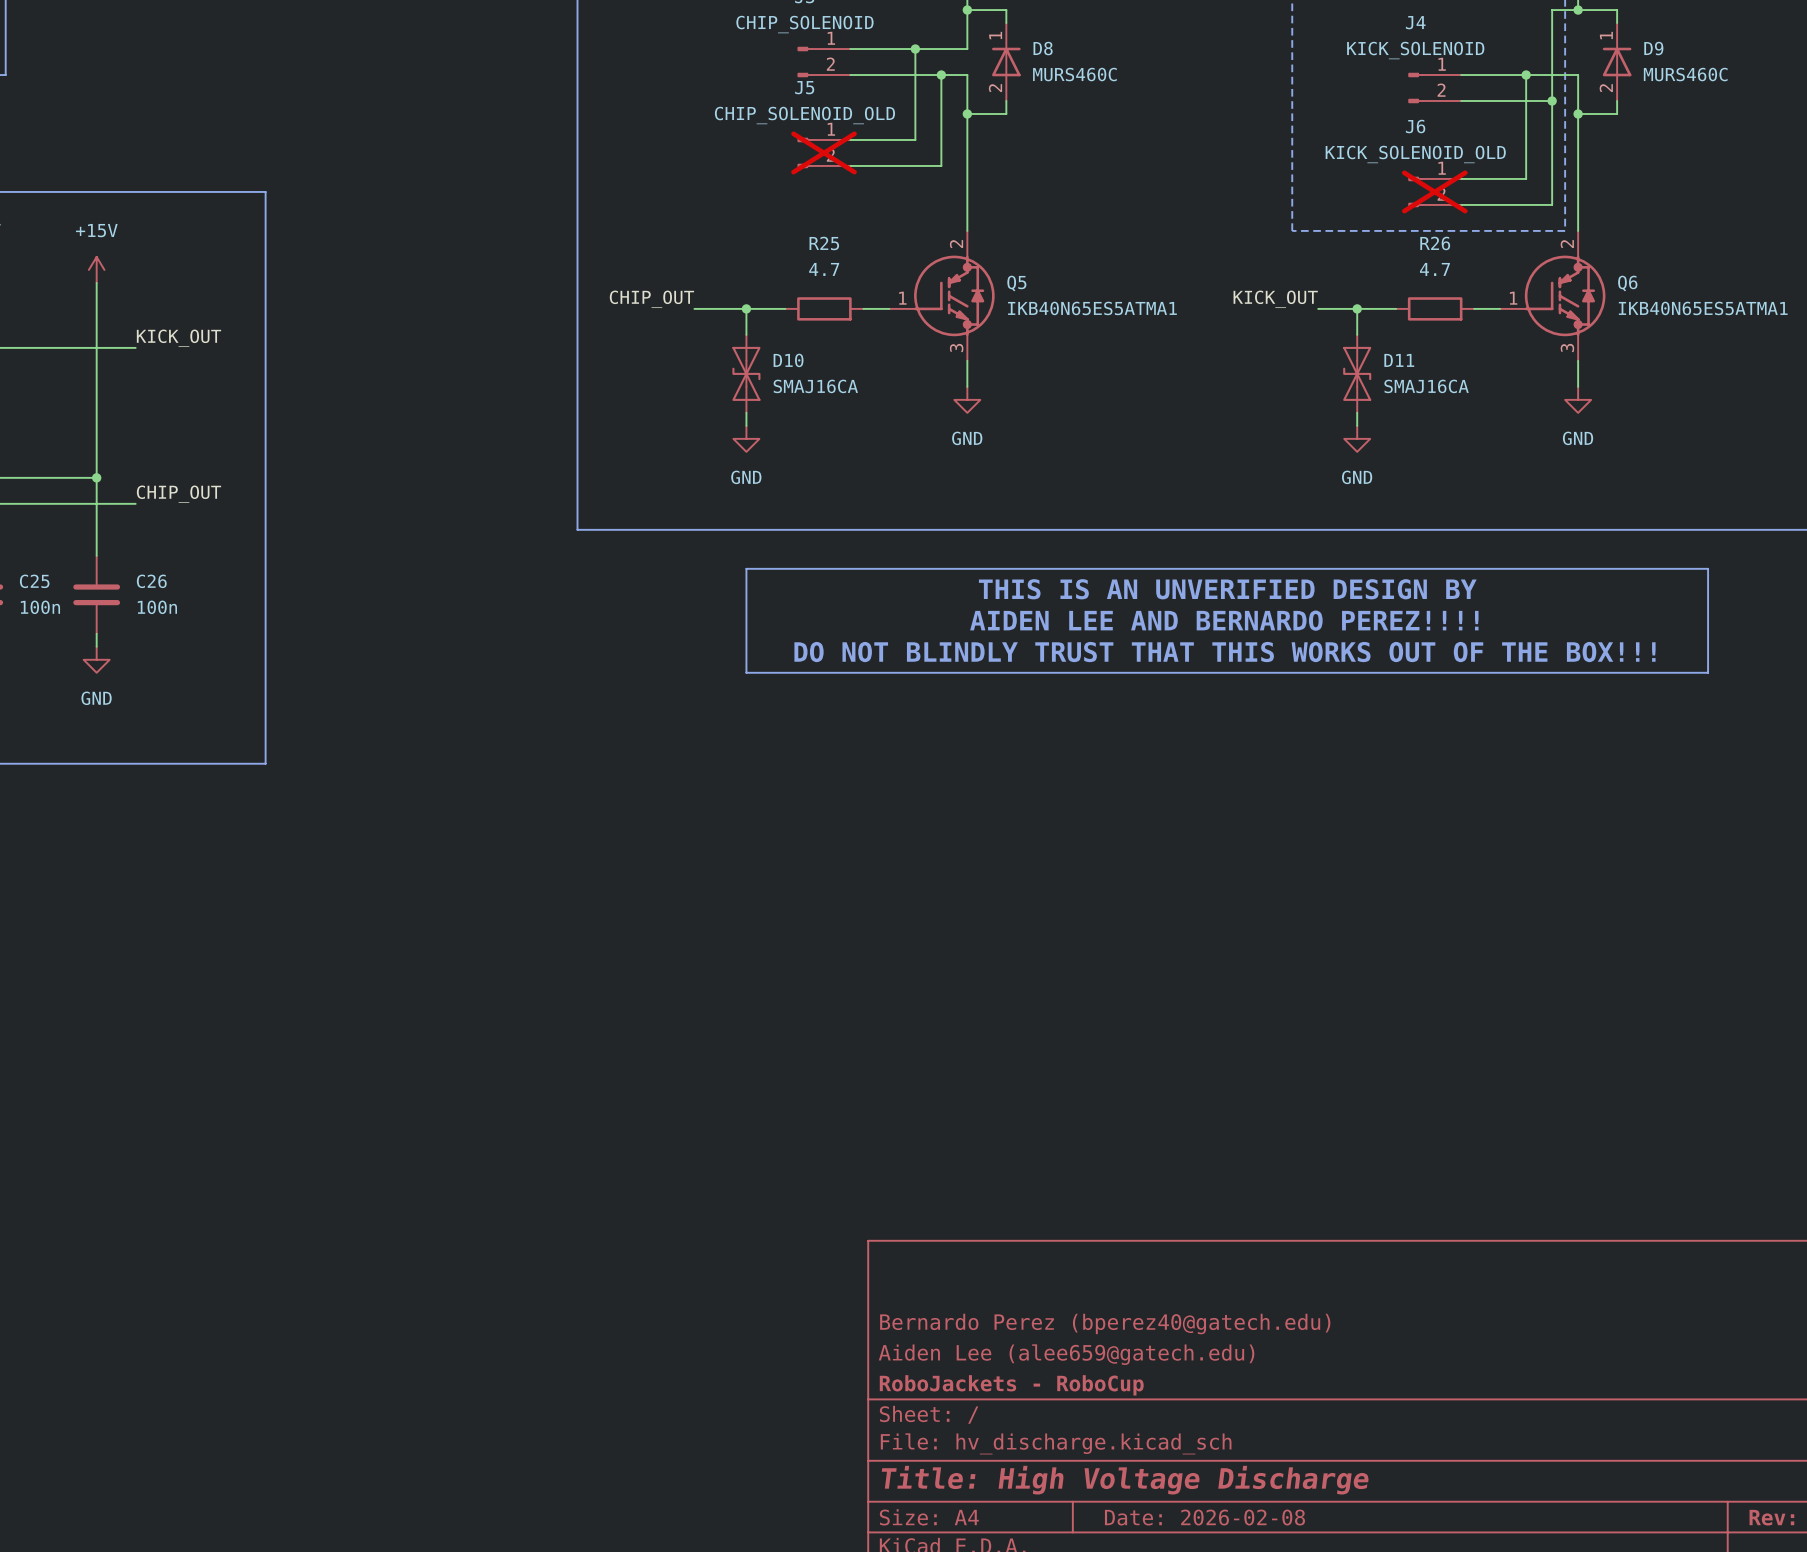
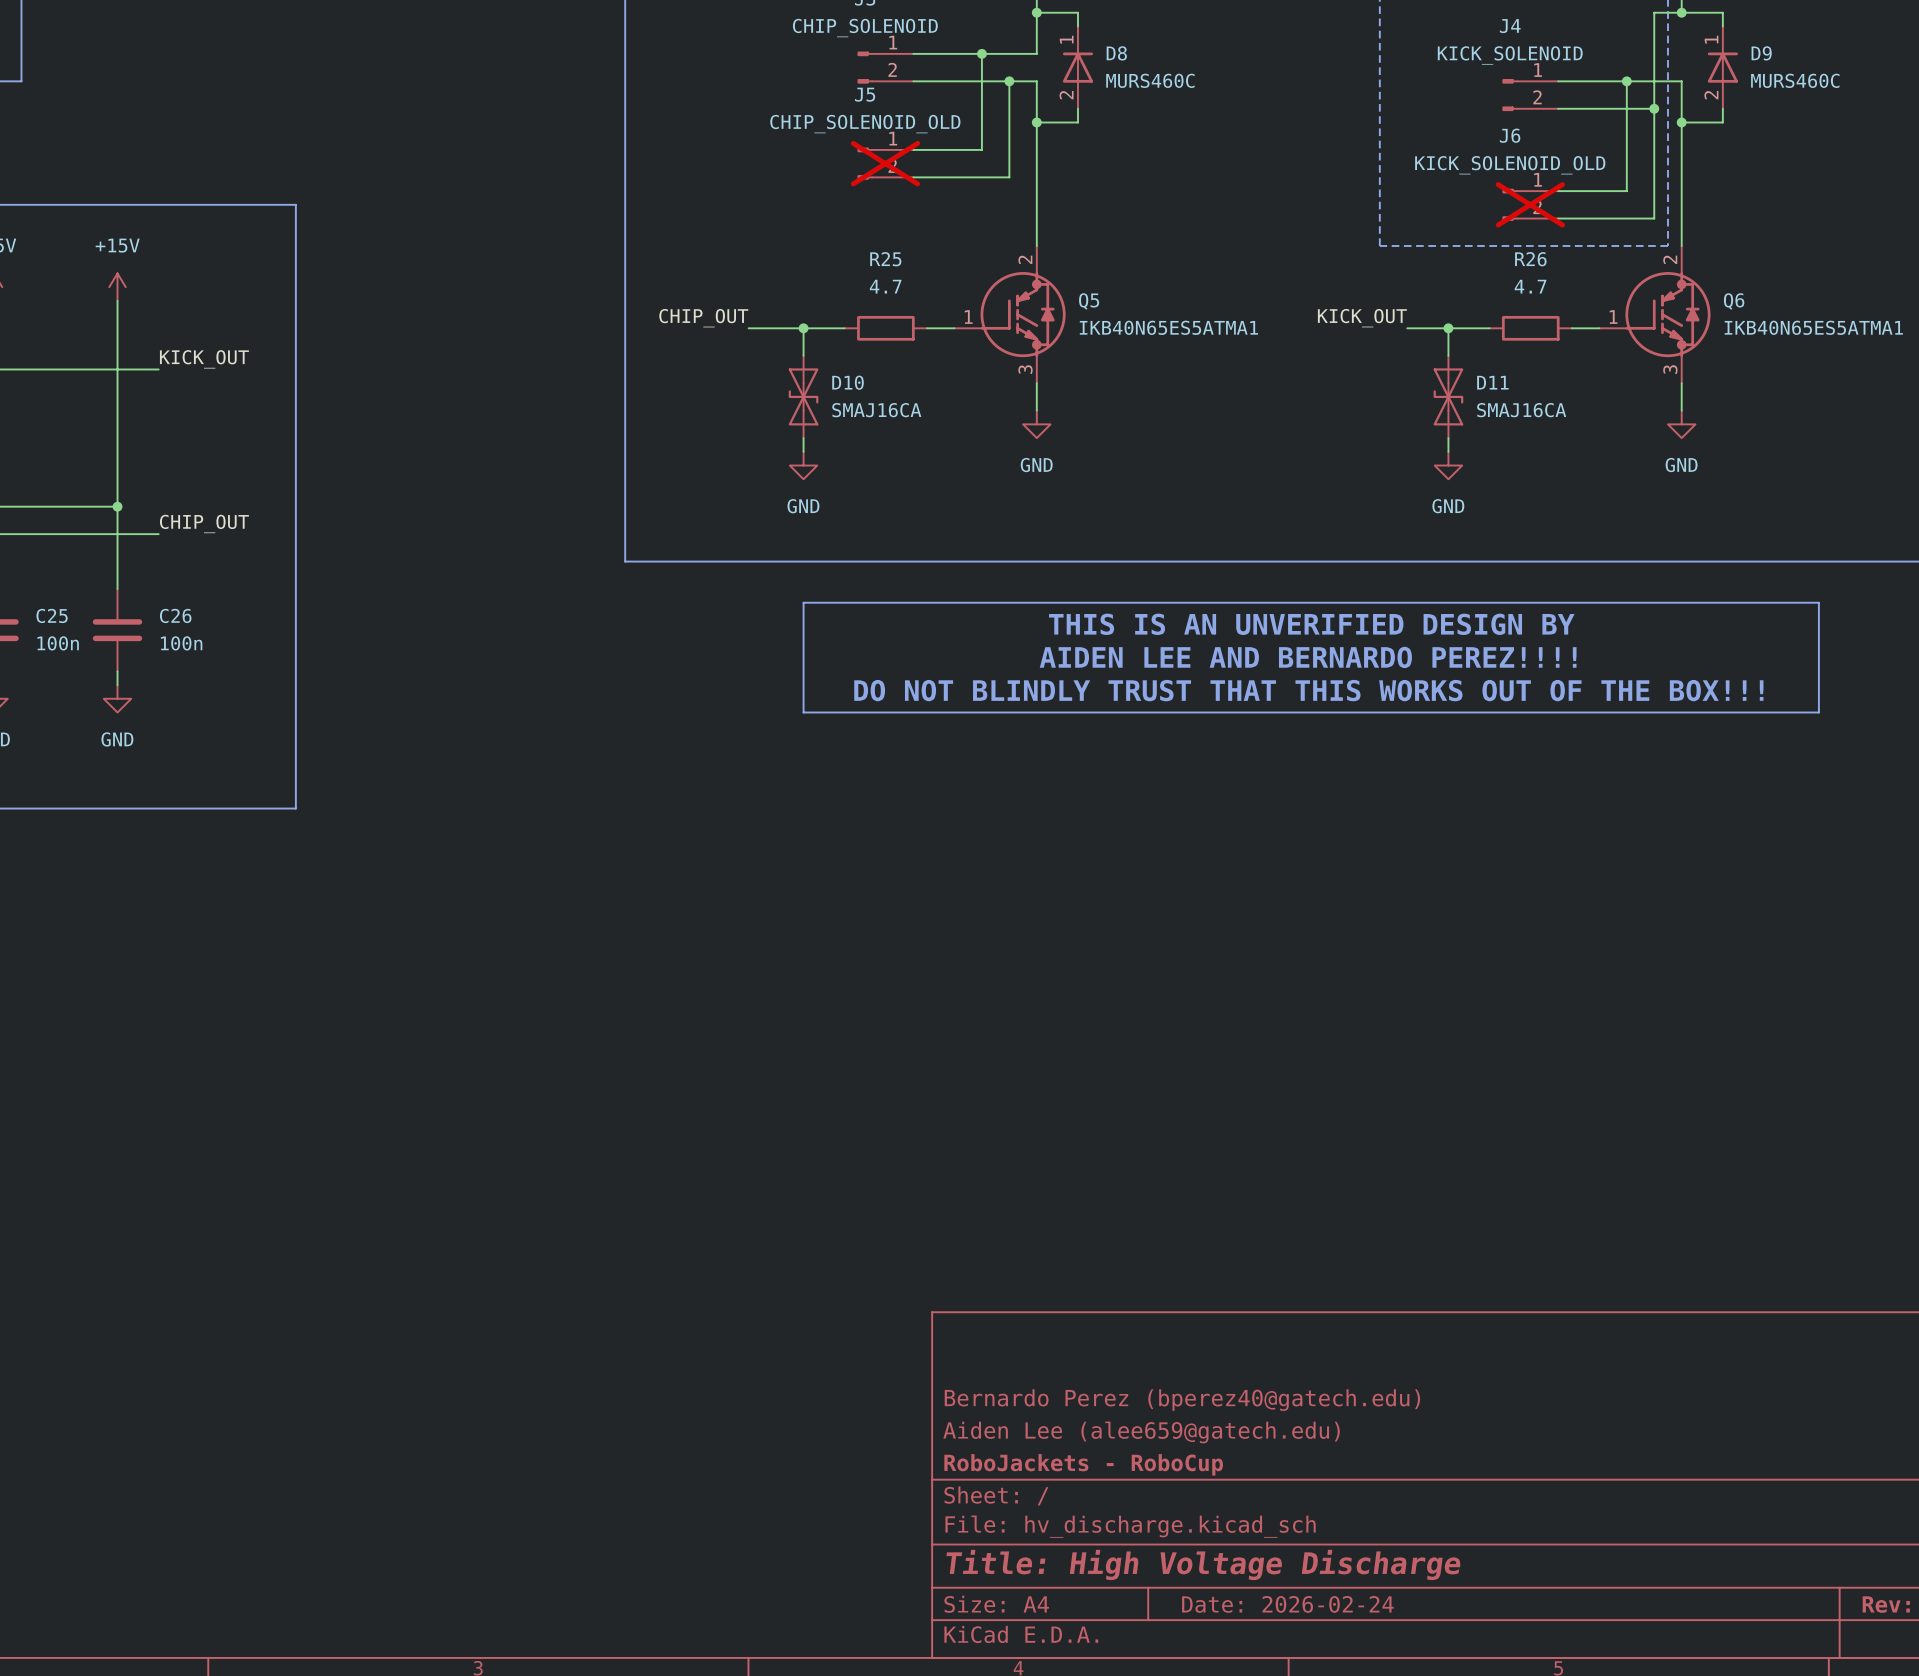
title block: Date: 2026-02-08 (1204, 1517) -> Date: 2026-02-24 (1287, 1604)

